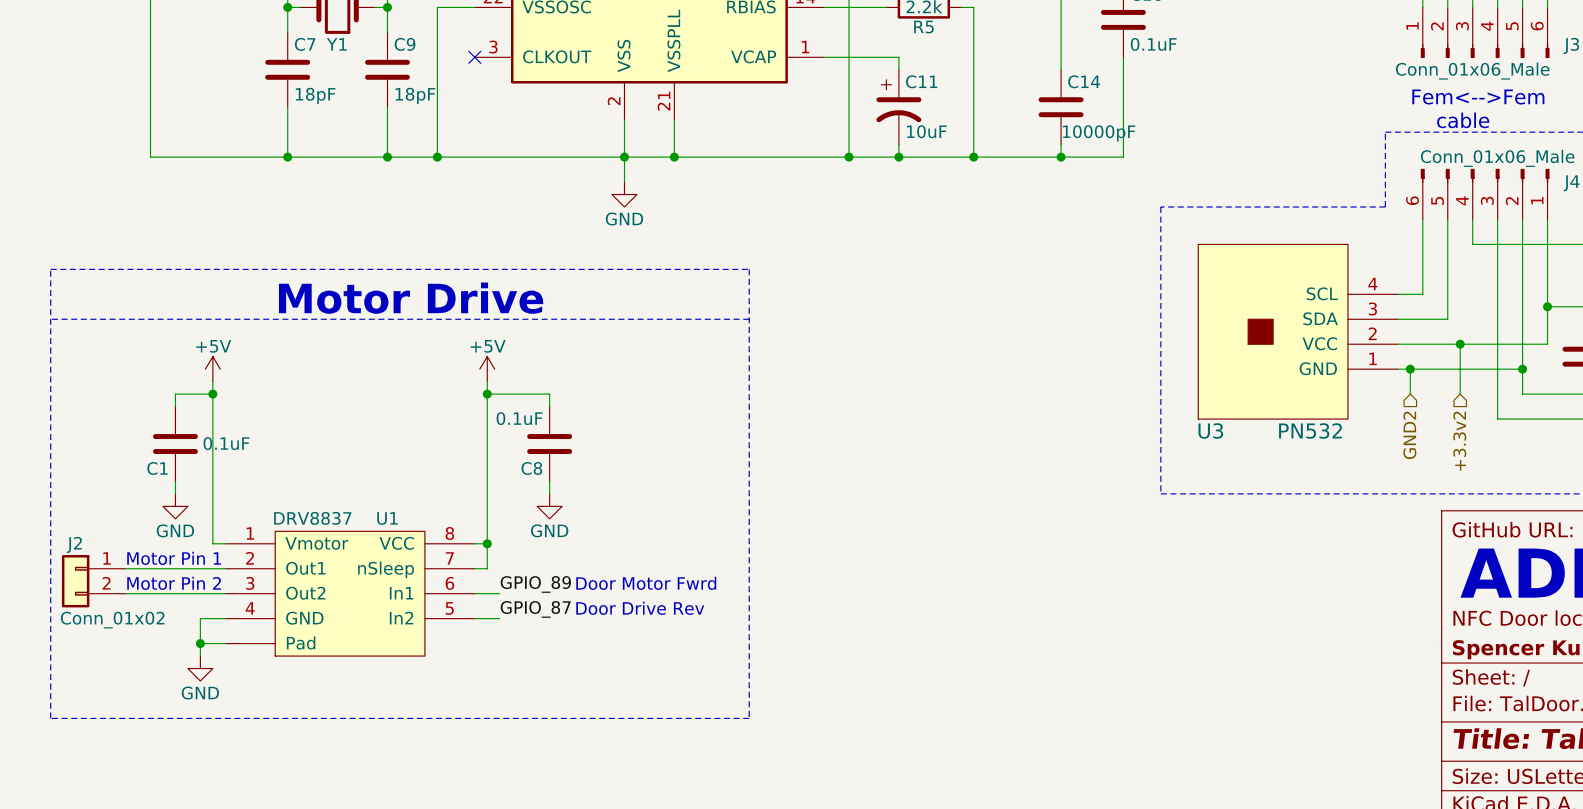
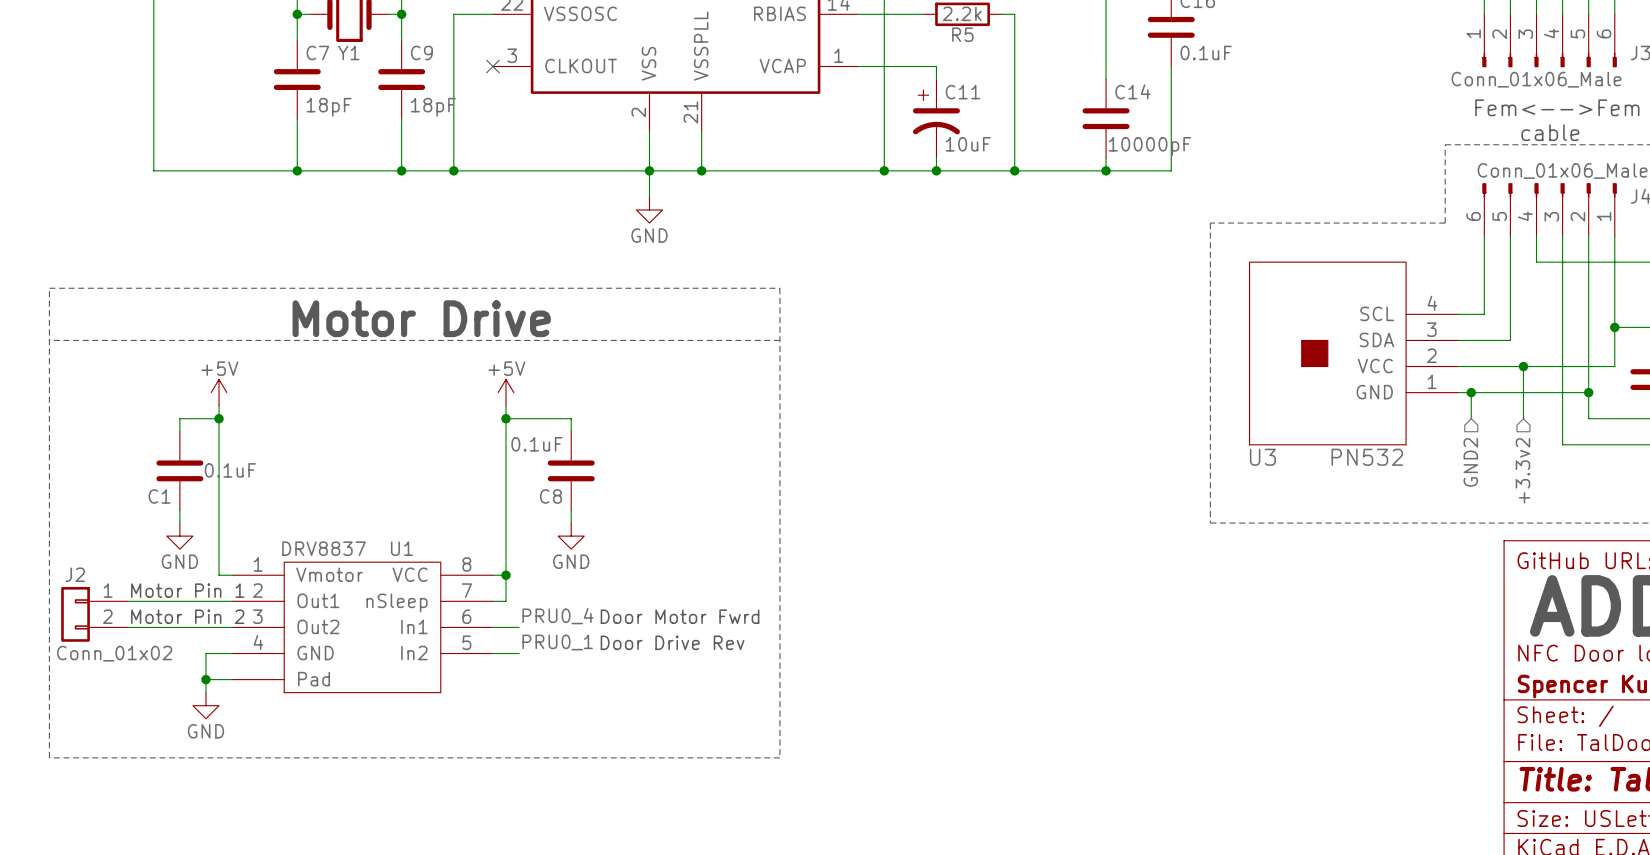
label: GPIO_89 (535, 584) -> PRU0_4 (557, 616)
label: GPIO_87 (535, 609) -> PRU0_1 (557, 642)

